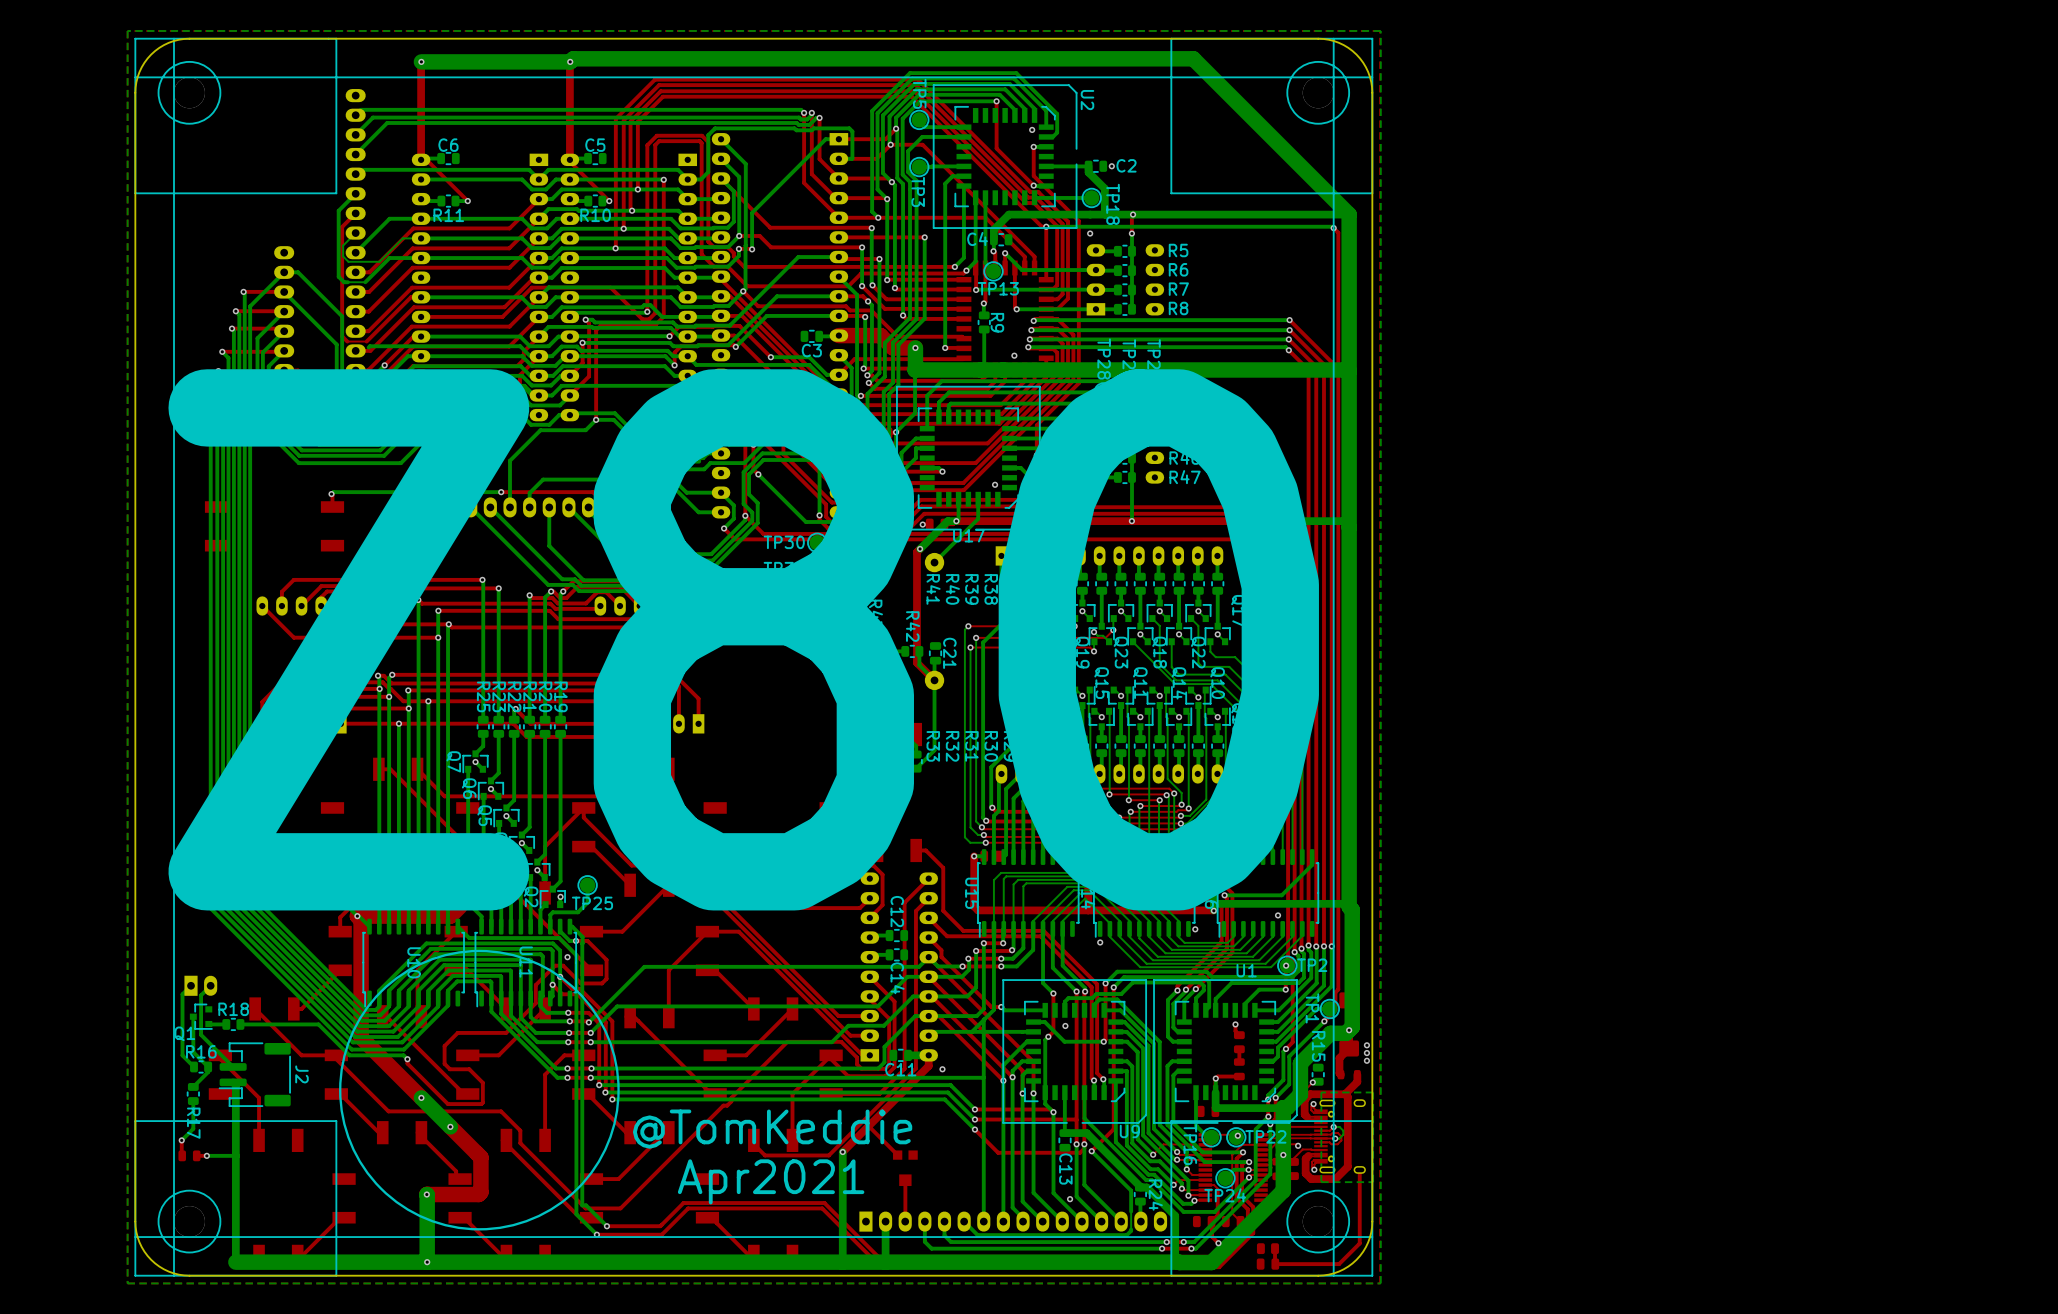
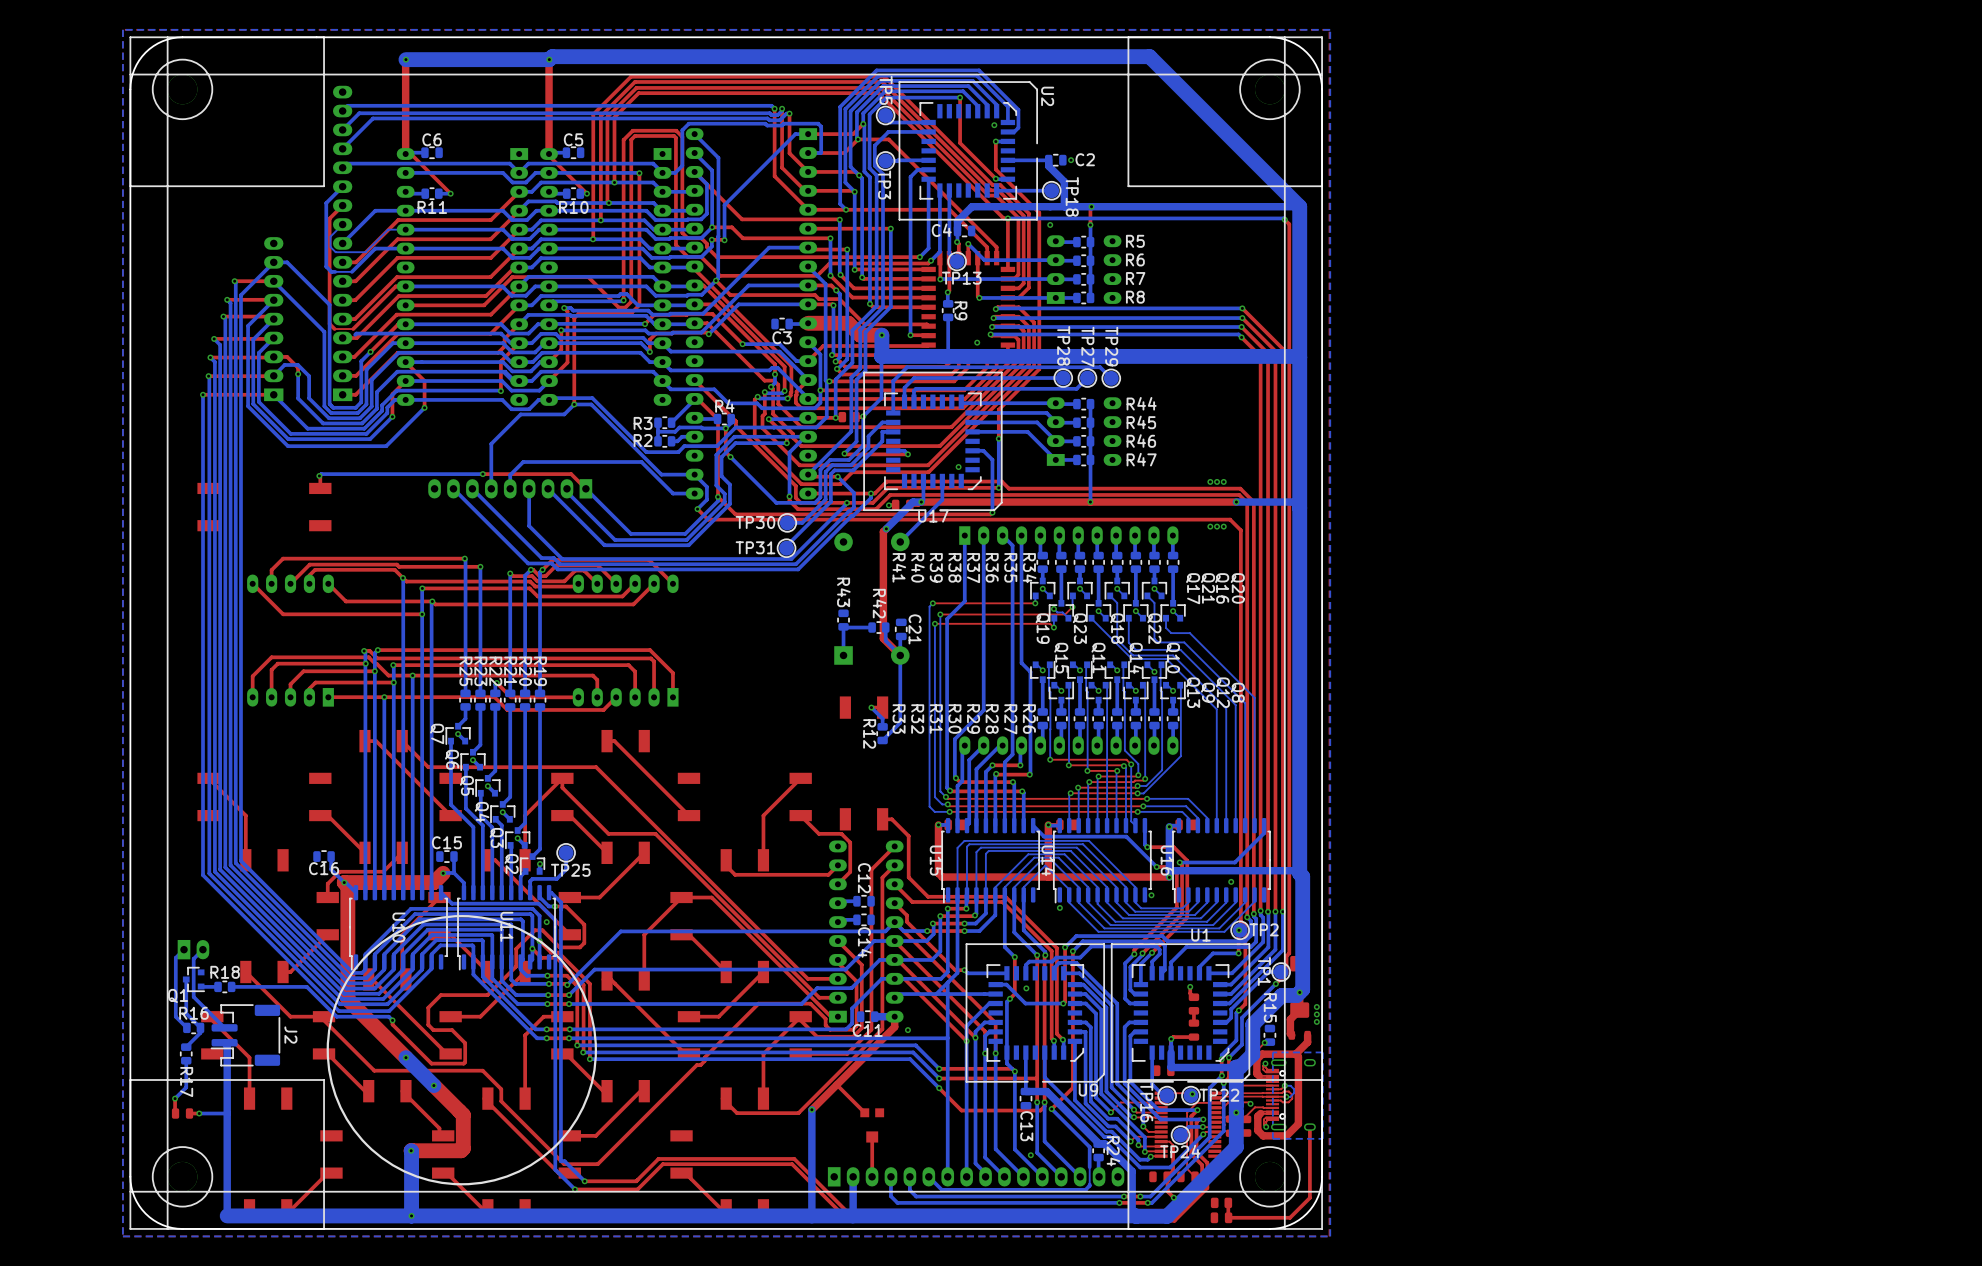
text: Z80 (743, 639) -> none
text: @TomKeddie (772, 1129) -> none
text: Apr2021 (771, 1181) -> none

